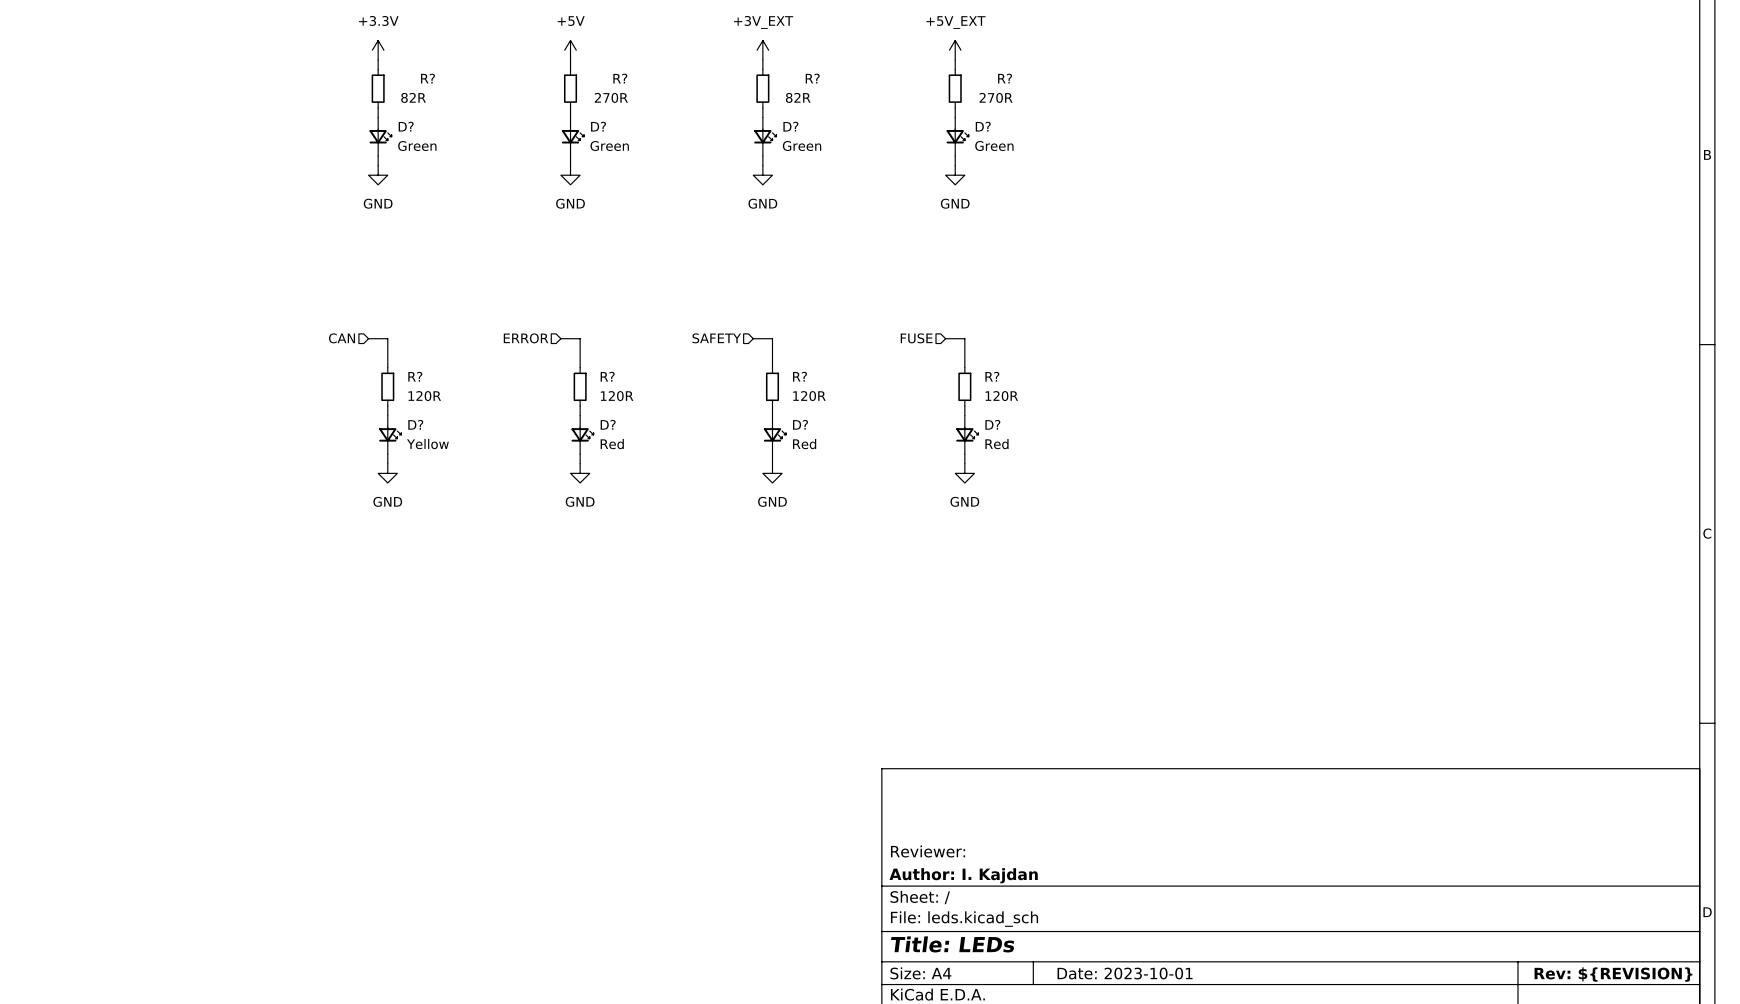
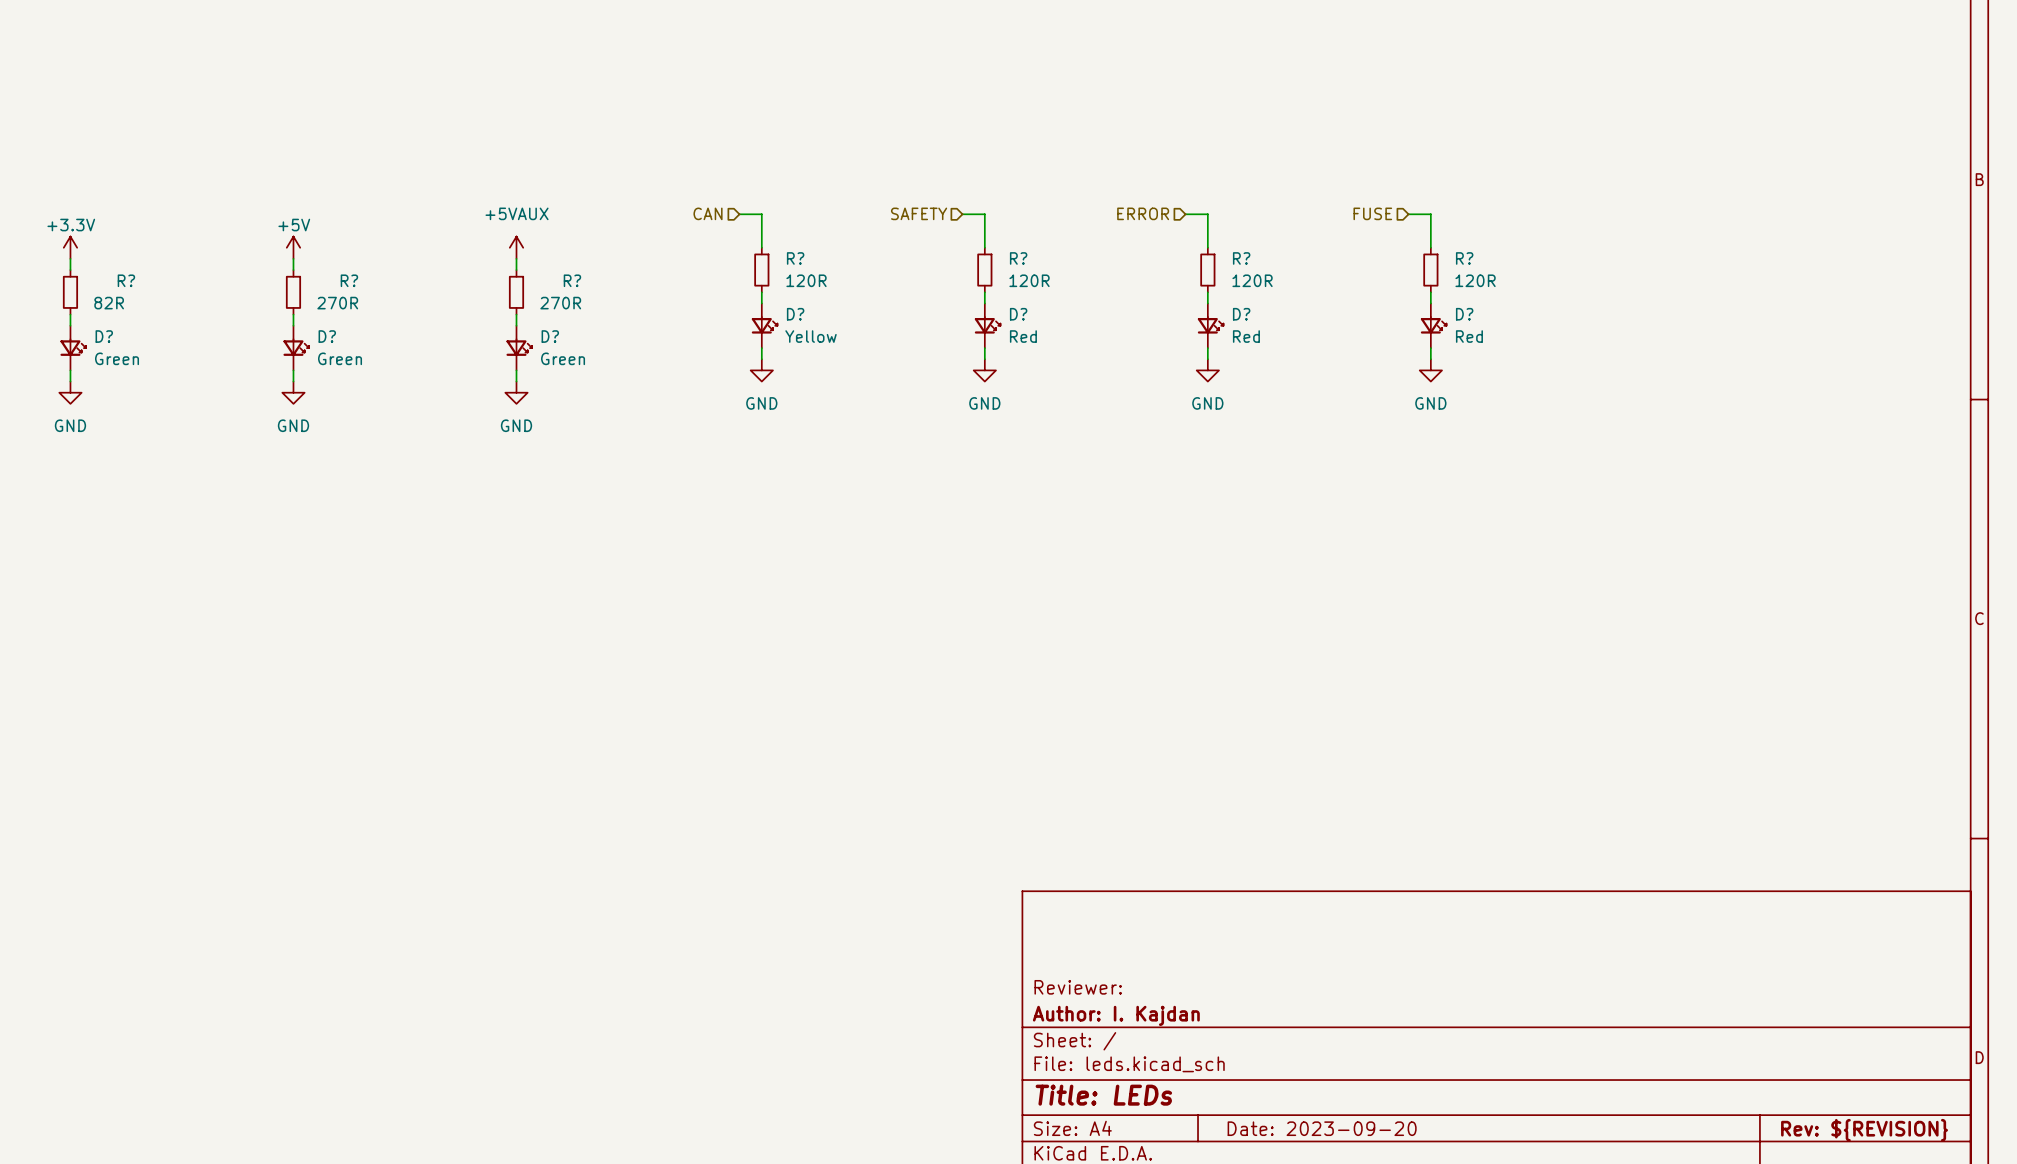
power symbol: +3.3V (378, 50) -> none
power symbol: +5V (570, 50) -> none
power symbol: +3V_EXT (762, 50) -> none
power symbol: +5V_EXT (955, 50) -> none
wire: (378, 59) (378, 69) -> none
wire: (570, 59) (570, 69) -> none
wire: (762, 59) (762, 69) -> none
wire: (955, 59) (955, 69) -> none
R?: 82R (378, 88) -> none
R?: 270R (570, 88) -> none
R?: 82R (762, 88) -> none
R?: 270R (955, 88) -> none
wire: (378, 107) (378, 117) -> (293, 258) (293, 270)
wire: (570, 107) (570, 117) -> (516, 258) (516, 270)
wire: (762, 107) (762, 117) -> none
wire: (955, 107) (955, 117) -> none
D?: Green (380, 136) -> none
D?: Green (572, 136) -> none
D?: Green (765, 136) -> none
D?: Green (957, 136) -> none
wire: (378, 155) (378, 165) -> (293, 314) (293, 325)
wire: (570, 155) (570, 165) -> (516, 314) (516, 325)
wire: (762, 155) (762, 165) -> none
wire: (955, 155) (955, 165) -> none
power symbol: GND (378, 175) -> none
power symbol: GND (570, 175) -> none
power symbol: GND (762, 175) -> none
power symbol: GND (955, 175) -> none
hierarchical label: none -> CAN (708, 213)
hierarchical label: none -> ERROR (1143, 213)
hierarchical label: none -> FUSE (1372, 213)
wire: none -> (1408, 214) (1430, 214) (1430, 247)
power symbol: none -> +3.3V (70, 247)
power symbol: none -> +5V (293, 247)
power symbol: none -> +5VAUX (516, 247)
wire: none -> (70, 258) (70, 270)
R?: none -> 120R (761, 270)
R?: none -> 120R (984, 270)
R?: none -> 120R (1207, 270)
R?: none -> 120R (1430, 270)
R?: none -> 82R (70, 292)
R?: none -> 270R (293, 292)
R?: none -> 270R (516, 292)
wire: none -> (1430, 292) (1430, 303)
wire: none -> (70, 314) (70, 325)
D?: none -> Yellow (764, 325)
D?: none -> Red (987, 325)
D?: none -> Red (1210, 325)
D?: none -> Red (1433, 325)
D?: none -> Green (73, 348)
D?: none -> Green (296, 348)
D?: none -> Green (519, 348)
wire: none -> (1430, 348) (1430, 359)
wire: none -> (70, 370) (70, 381)
power symbol: none -> GND (761, 370)
power symbol: none -> GND (984, 370)
power symbol: none -> GND (1207, 370)
power symbol: none -> GND (1430, 370)
power symbol: none -> GND (70, 392)
power symbol: none -> GND (293, 392)
hierarchical label: CAN (342, 338) -> none
wire: (368, 338) (387, 338) (387, 367) -> none
power symbol: none -> GND (516, 392)
hierarchical label: ERROR (526, 338) -> none
wire: (560, 338) (580, 338) (580, 367) -> (739, 214) (761, 214) (761, 247)
hierarchical label position: SAFETY (716, 338) -> SAFETY (919, 213)
wire: (753, 338) (772, 338) (772, 367) -> (962, 214) (984, 214) (984, 247)
hierarchical label: FUSE (916, 338) -> none
wire: (945, 338) (964, 338) (964, 367) -> (1185, 214) (1207, 214) (1207, 247)
R?: 120R (387, 386) -> none
R?: 120R (580, 386) -> none
R?: 120R (772, 386) -> none
R?: 120R (964, 386) -> none
wire: (387, 406) (387, 415) -> (293, 370) (293, 381)
wire: (580, 406) (580, 415) -> (761, 292) (761, 303)
wire: (772, 406) (772, 415) -> (984, 292) (984, 303)
wire: (964, 406) (964, 415) -> (1207, 292) (1207, 303)
D?: Yellow (390, 434) -> none
D?: Red (582, 434) -> none
D?: Red (774, 434) -> none
D?: Red (967, 434) -> none
wire: (387, 454) (387, 463) -> (516, 370) (516, 381)
wire: (580, 454) (580, 463) -> (761, 348) (761, 359)
wire: (772, 454) (772, 463) -> (984, 348) (984, 359)
wire: (964, 454) (964, 463) -> (1207, 348) (1207, 359)
power symbol: GND (387, 473) -> none
power symbol: GND (580, 473) -> none
power symbol: GND (772, 473) -> none
power symbol: GND (964, 473) -> none
title block: Date: 2023-10-01 (1125, 973) -> Date: 2023-09-20 (1322, 1128)

